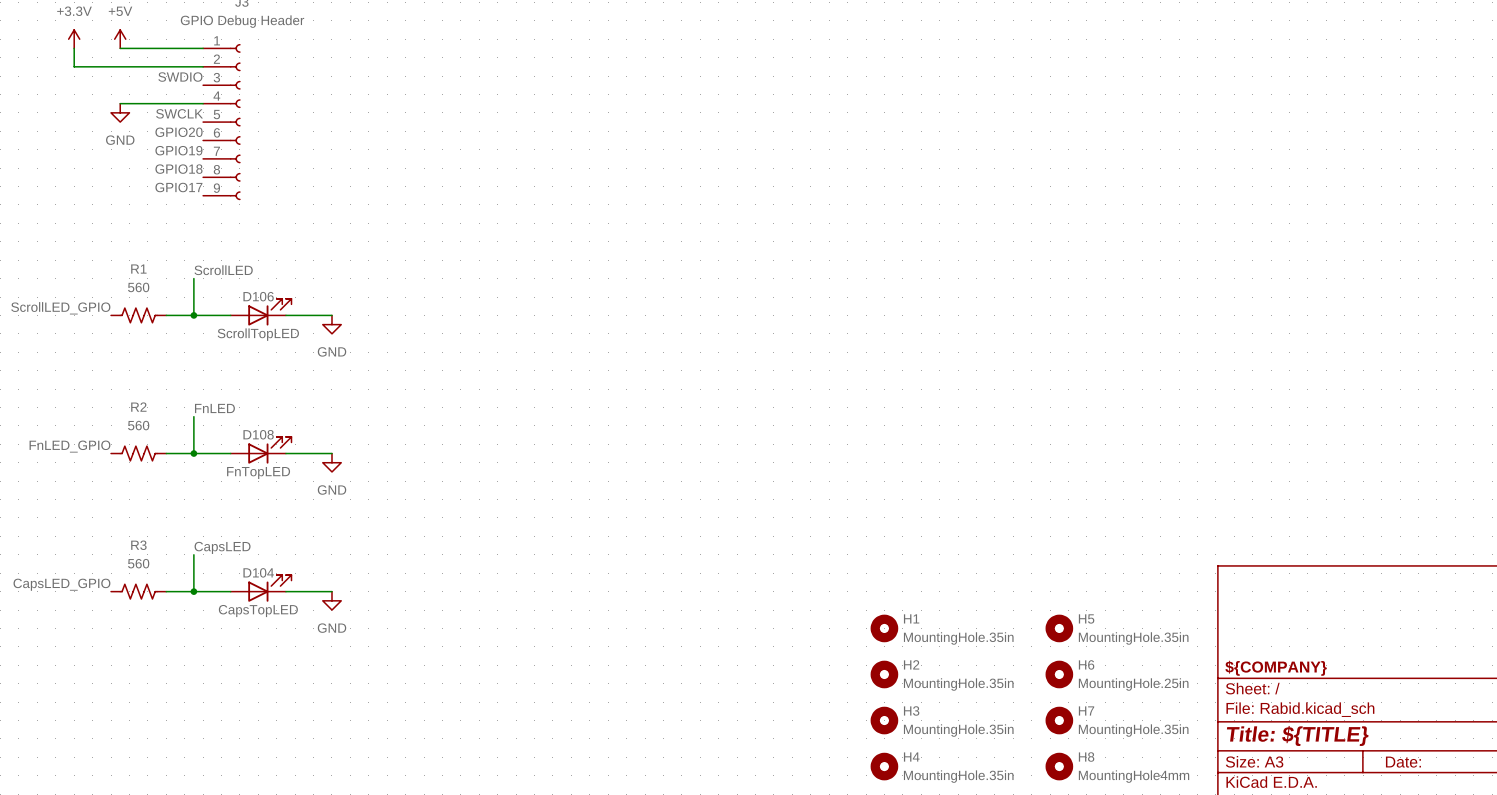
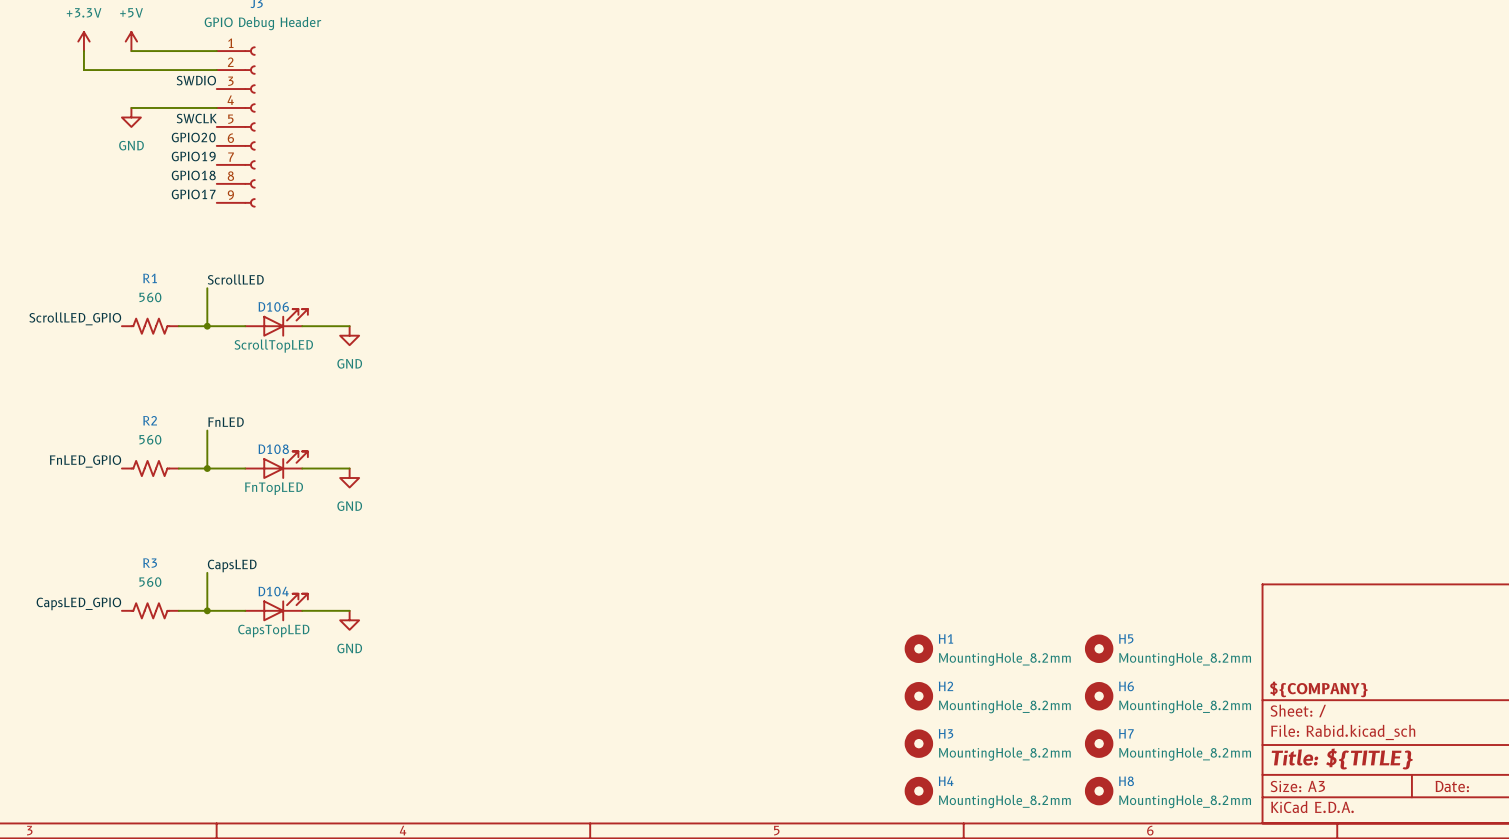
H1 value: MountingHole.35in (958, 638) -> MountingHole_8.2mm (1004, 659)
H5 value: MountingHole.35in (1133, 638) -> MountingHole_8.2mm (1185, 659)
H2 value: MountingHole.35in (958, 684) -> MountingHole_8.2mm (1004, 706)
H6 value: MountingHole.25in (1133, 684) -> MountingHole_8.2mm (1185, 706)
H3 value: MountingHole.35in (958, 730) -> MountingHole_8.2mm (1004, 754)
H7 value: MountingHole.35in (1133, 730) -> MountingHole_8.2mm (1185, 754)
H4 value: MountingHole.35in (958, 776) -> MountingHole_8.2mm (1004, 801)
H8 value: MountingHole4mm (1134, 776) -> MountingHole_8.2mm (1185, 801)

